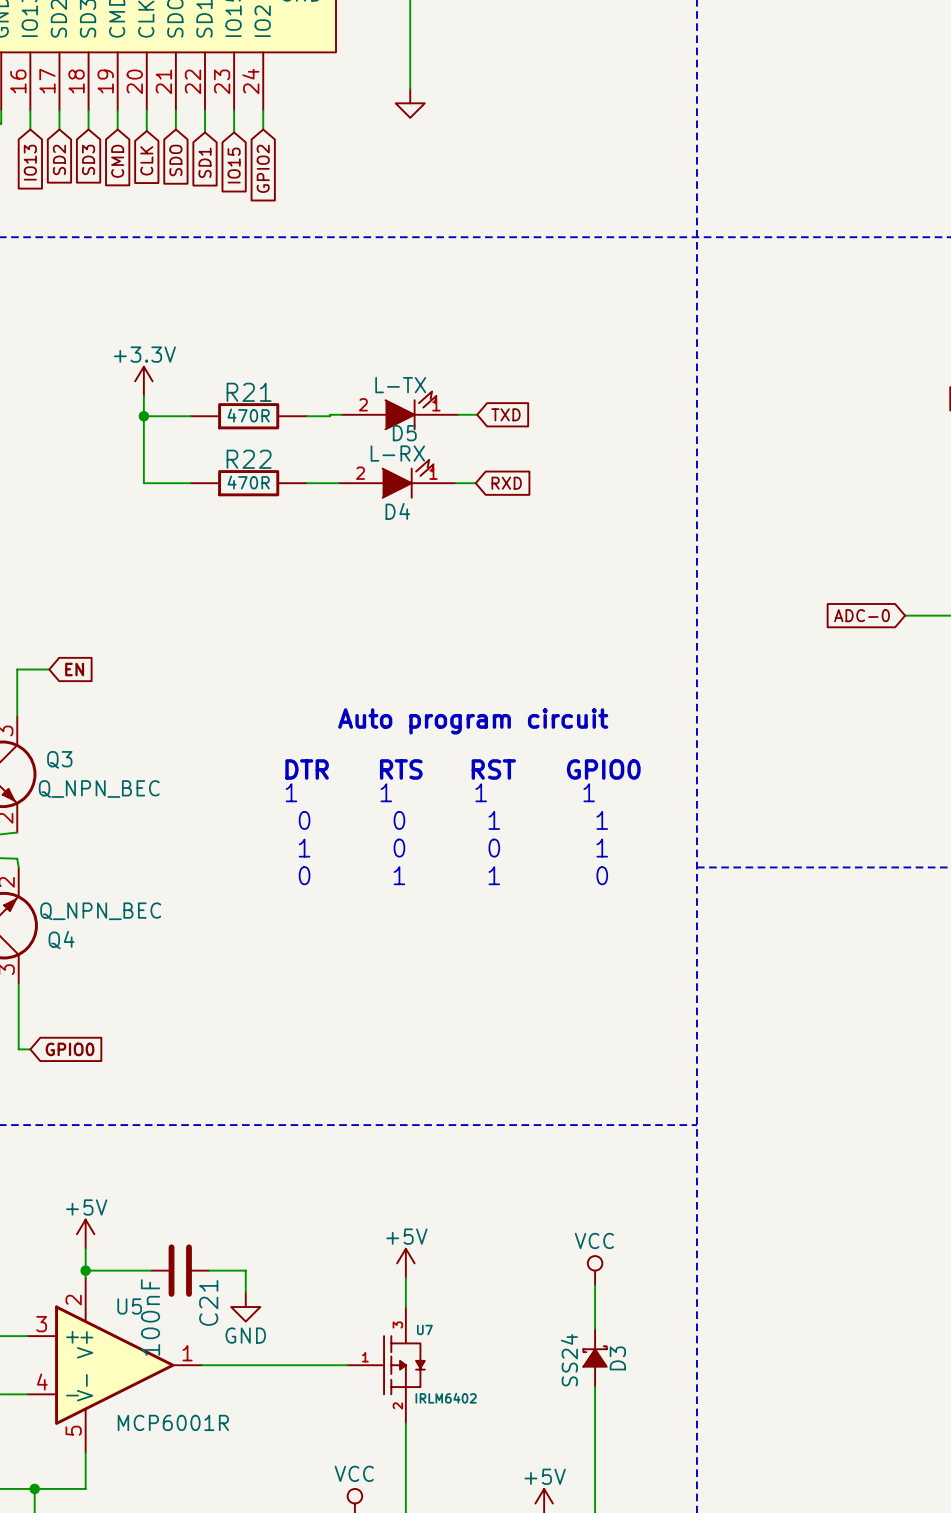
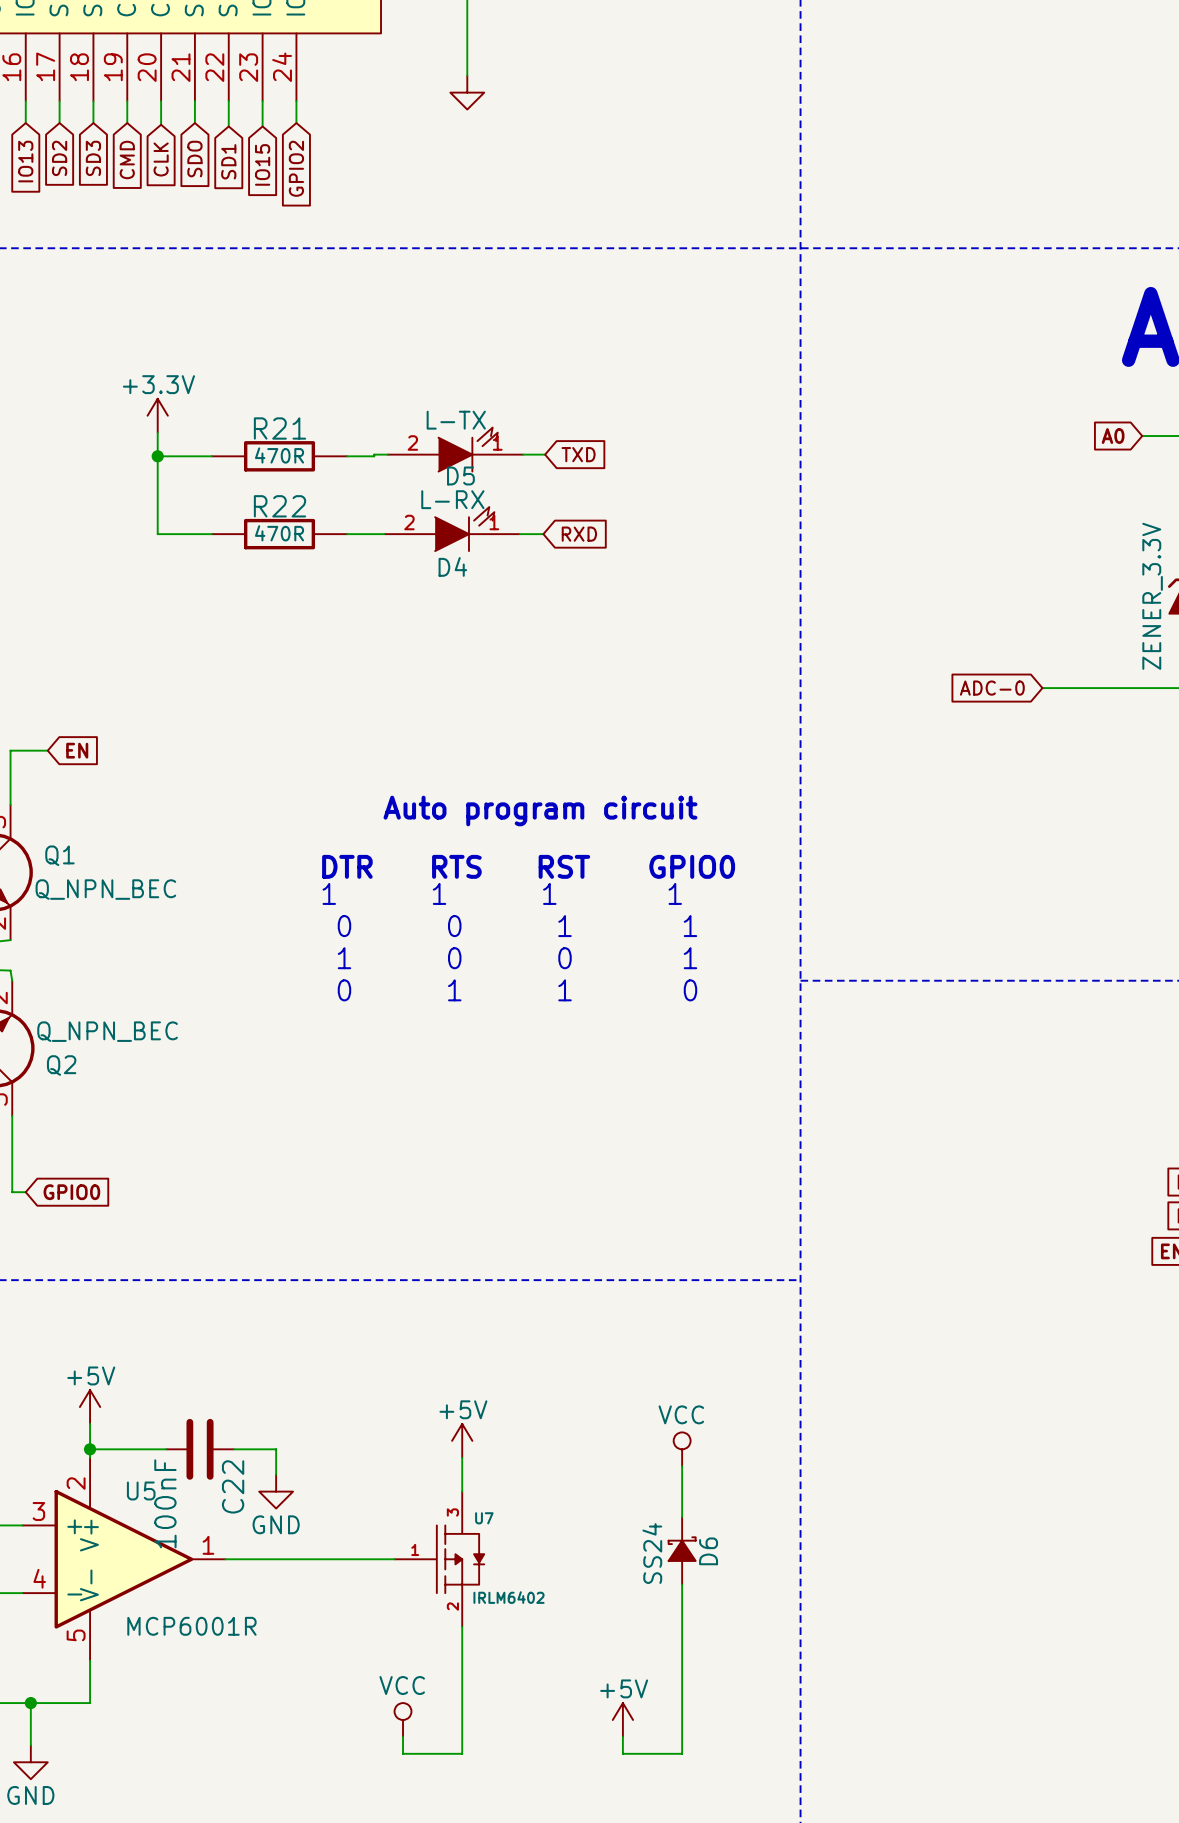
Q3 name: Q3 (59, 759) -> Q1 (59, 855)
Q4 name: Q4 (61, 940) -> Q2 (61, 1065)
C21 name: C21 (208, 1302) -> C22 (233, 1486)
D3 name: D3 (617, 1358) -> D6 (708, 1551)

